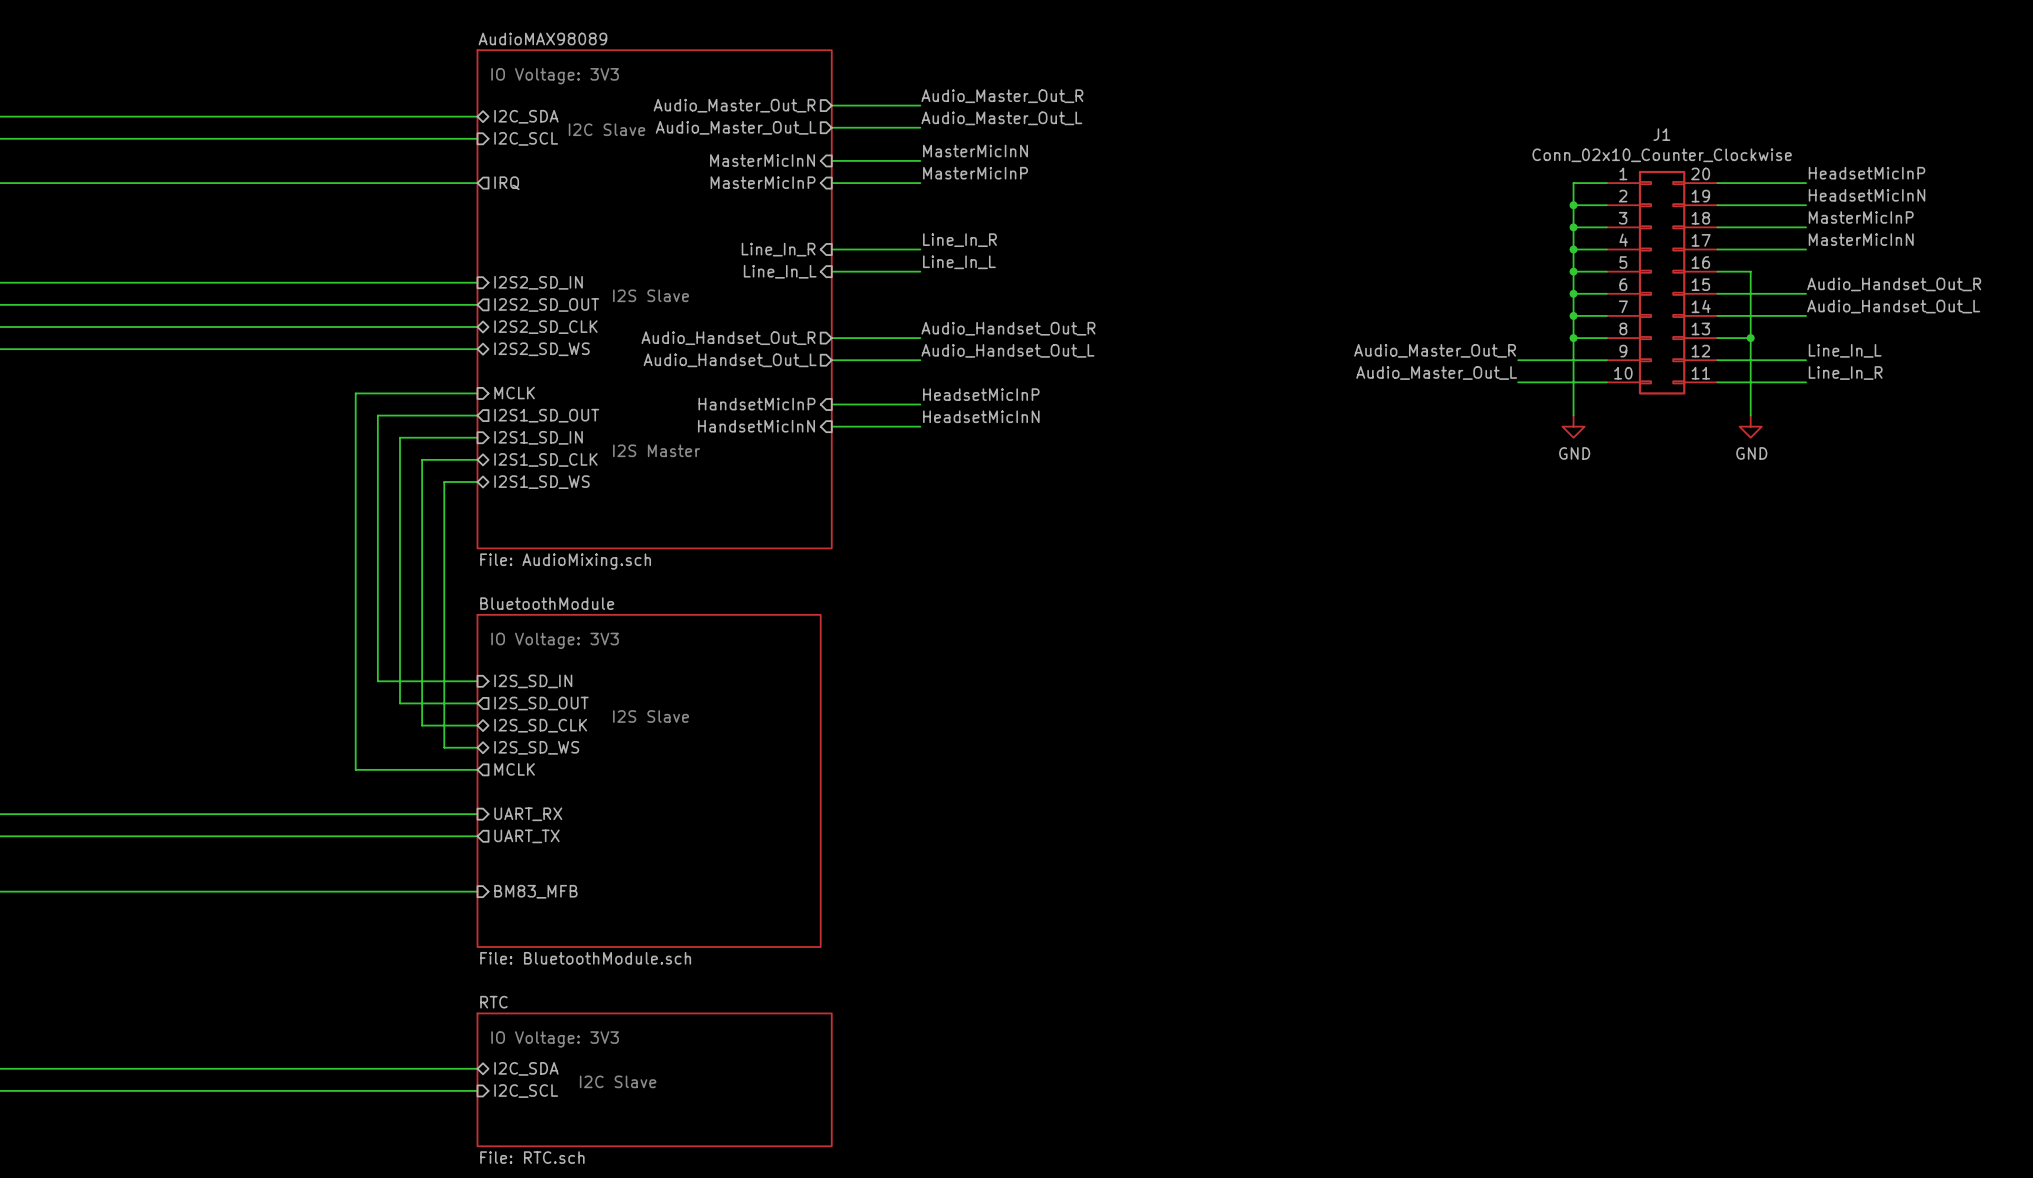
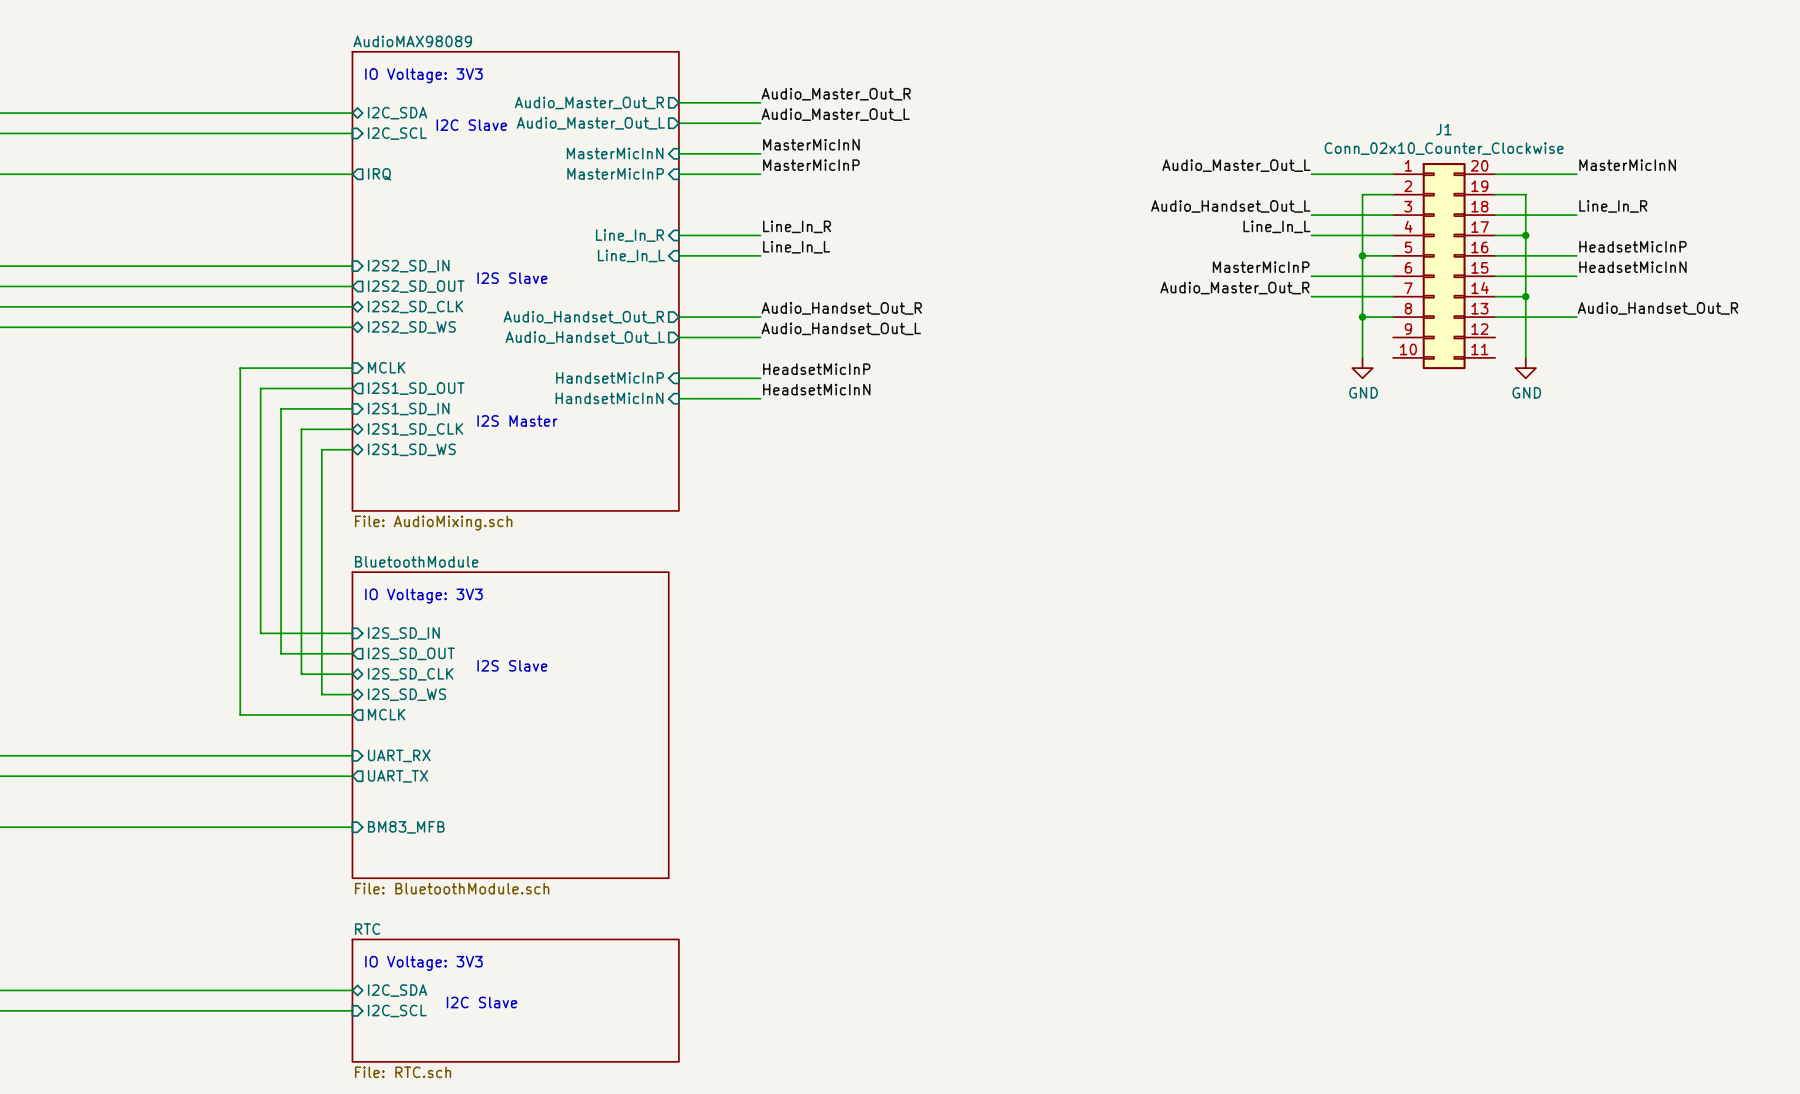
label: HeadsetMicInP (1867, 173) -> MasterMicInN (1627, 165)
wire: (1573, 183) (1573, 205) -> (1362, 174) (1311, 174)
label: HeadsetMicInN (1867, 195) -> none
junction: (1573, 205) -> none
wire: (1750, 205) (1806, 205) -> (1525, 194) (1525, 255) (1576, 255)
label: MasterMicInP (1861, 217) -> Line_In_R (1613, 206)
label: none -> Audio_Handset_Out_L (1230, 206)
wire: none -> (1311, 215) (1362, 215)
junction: (1573, 227) -> none
label: MasterMicInN (1861, 239) -> HeadsetMicInP (1632, 246)
label: none -> Line_In_L (1276, 226)
wire: none -> (1311, 235) (1362, 235)
junction: (1573, 249) -> none
wire: (1750, 249) (1806, 249) -> none
junction: none -> (1525, 235)
label: none -> MasterMicInP (1261, 267)
label: Audio_Handset_Out_R (1894, 284) -> HeadsetMicInN (1632, 267)
wire: none -> (1311, 276) (1362, 276)
junction: (1573, 293) -> none
label: Audio_Handset_Out_L (1893, 306) -> Audio_Handset_Out_R (1657, 308)
wire: none -> (1311, 296) (1362, 296)
junction: (1573, 315) -> none
wire: (1750, 315) (1806, 315) -> (1525, 317) (1576, 317)
junction position: (1750, 338) -> (1525, 296)
label position: Audio_Master_Out_R (1435, 350) -> Audio_Master_Out_R (1234, 288)
label: Line_In_L (1845, 350) -> none
wire: (1518, 360) (1606, 360) -> none
wire: (1717, 360) (1806, 360) -> none
label position: Audio_Master_Out_L (1436, 373) -> Audio_Master_Out_L (1236, 165)
label: Line_In_R (1845, 373) -> none
wire: (1518, 382) (1606, 382) -> none
wire: (1573, 382) (1573, 415) -> none
wire: (1717, 382) (1806, 382) -> none
wire: (1750, 382) (1750, 415) -> none
power symbol position: GND (1573, 426) -> GND (1362, 368)
power symbol position: GND (1750, 426) -> GND (1525, 368)

